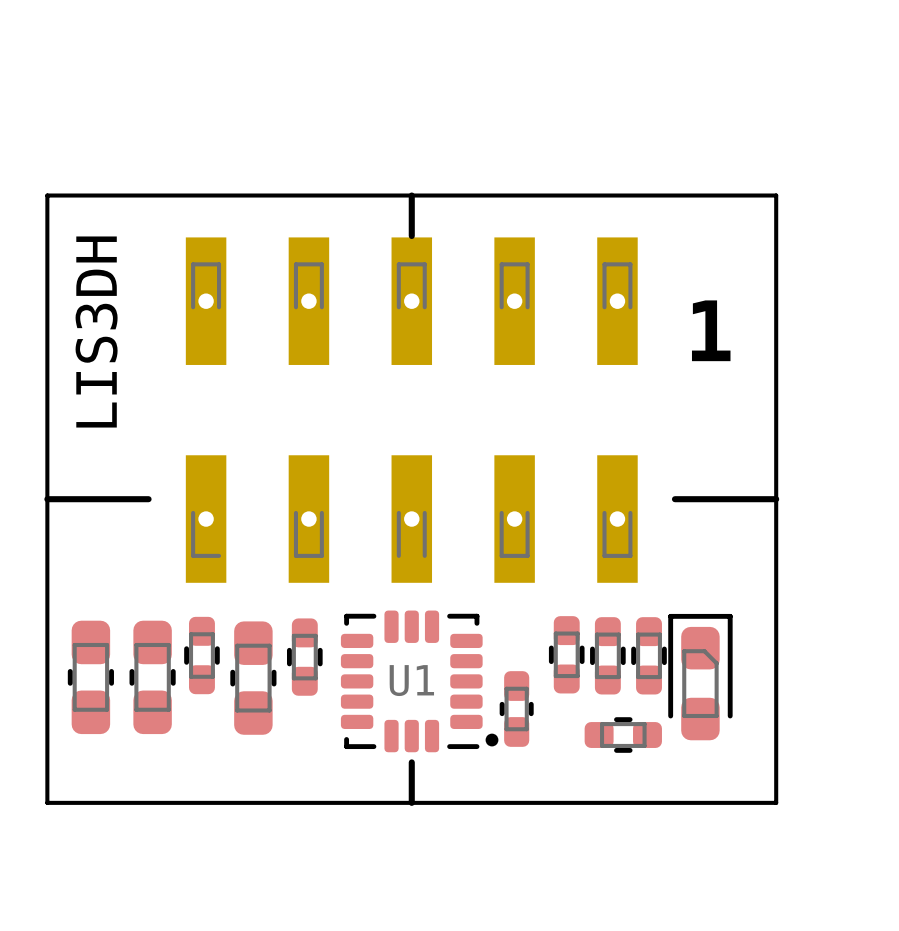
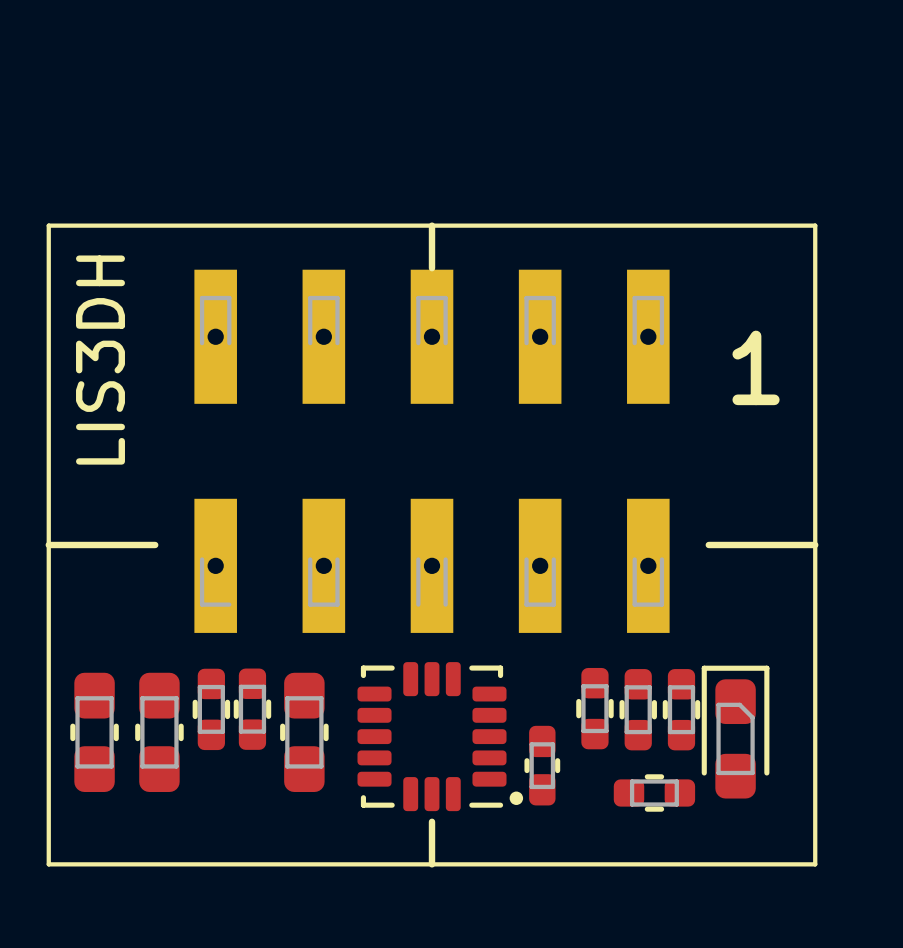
part position: (304, 657) -> (252, 709)
part position: (253, 678) -> (304, 732)
U1 name: U1 (411, 680) -> none

